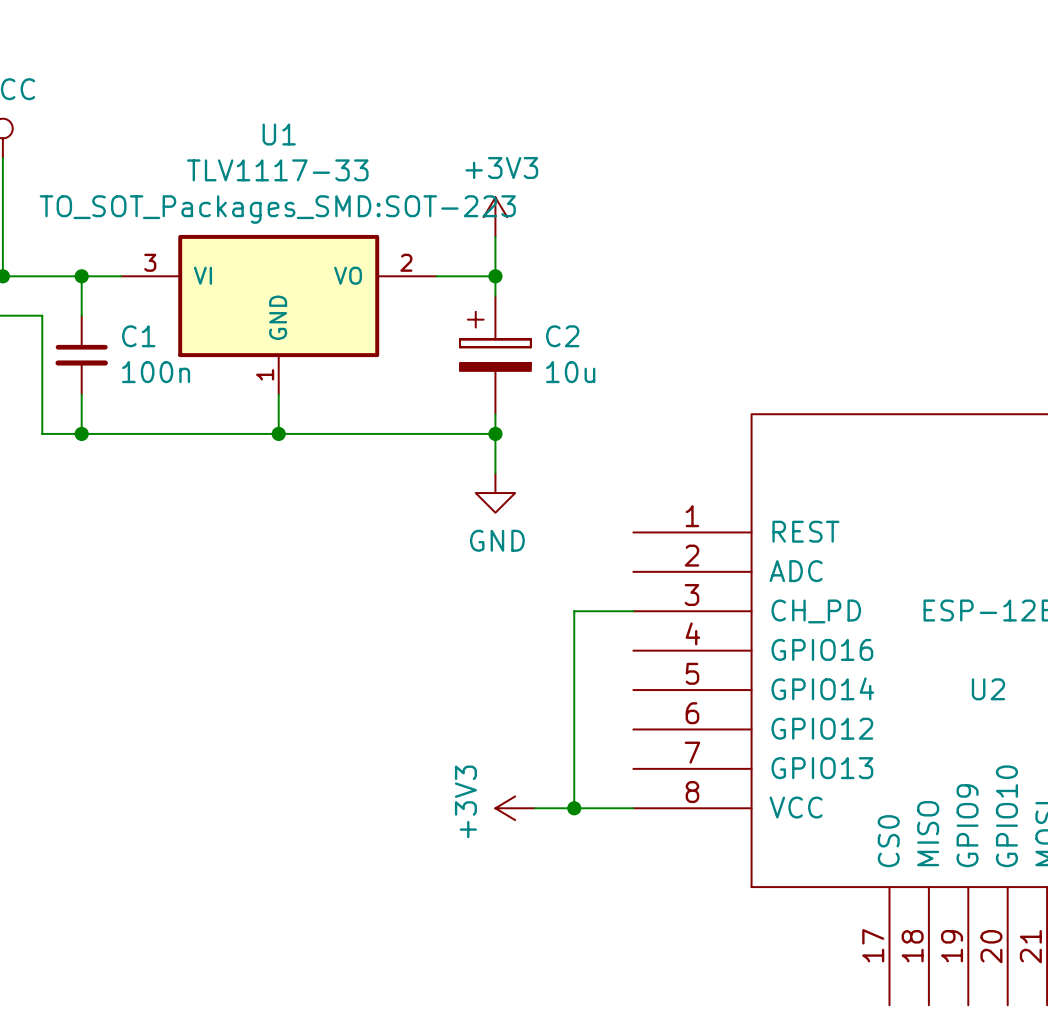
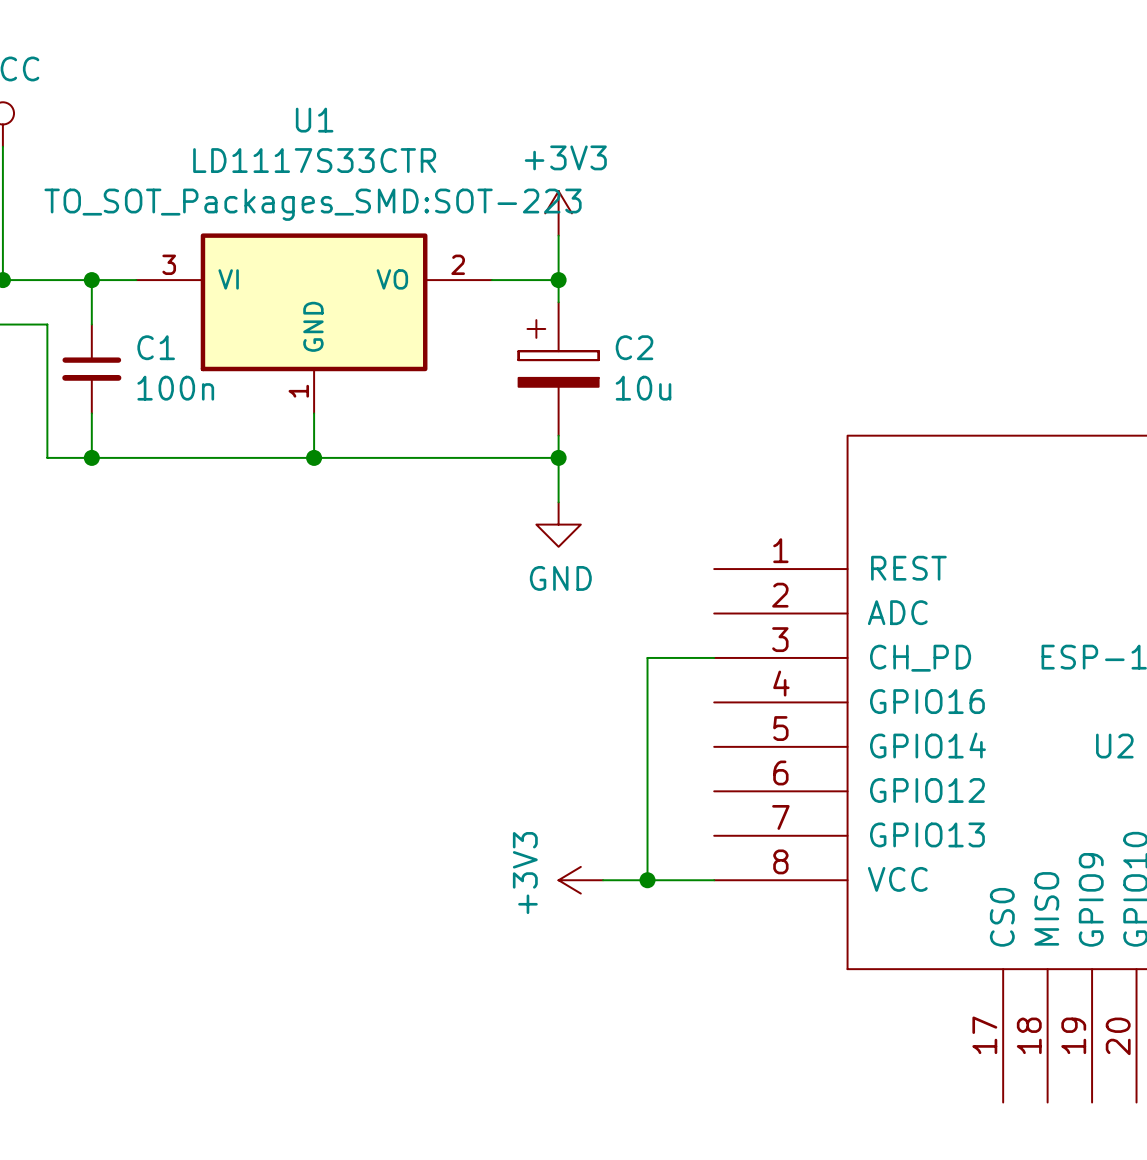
U1 value: TLV1117-33 (277, 170) -> LD1117S33CTR (314, 160)

